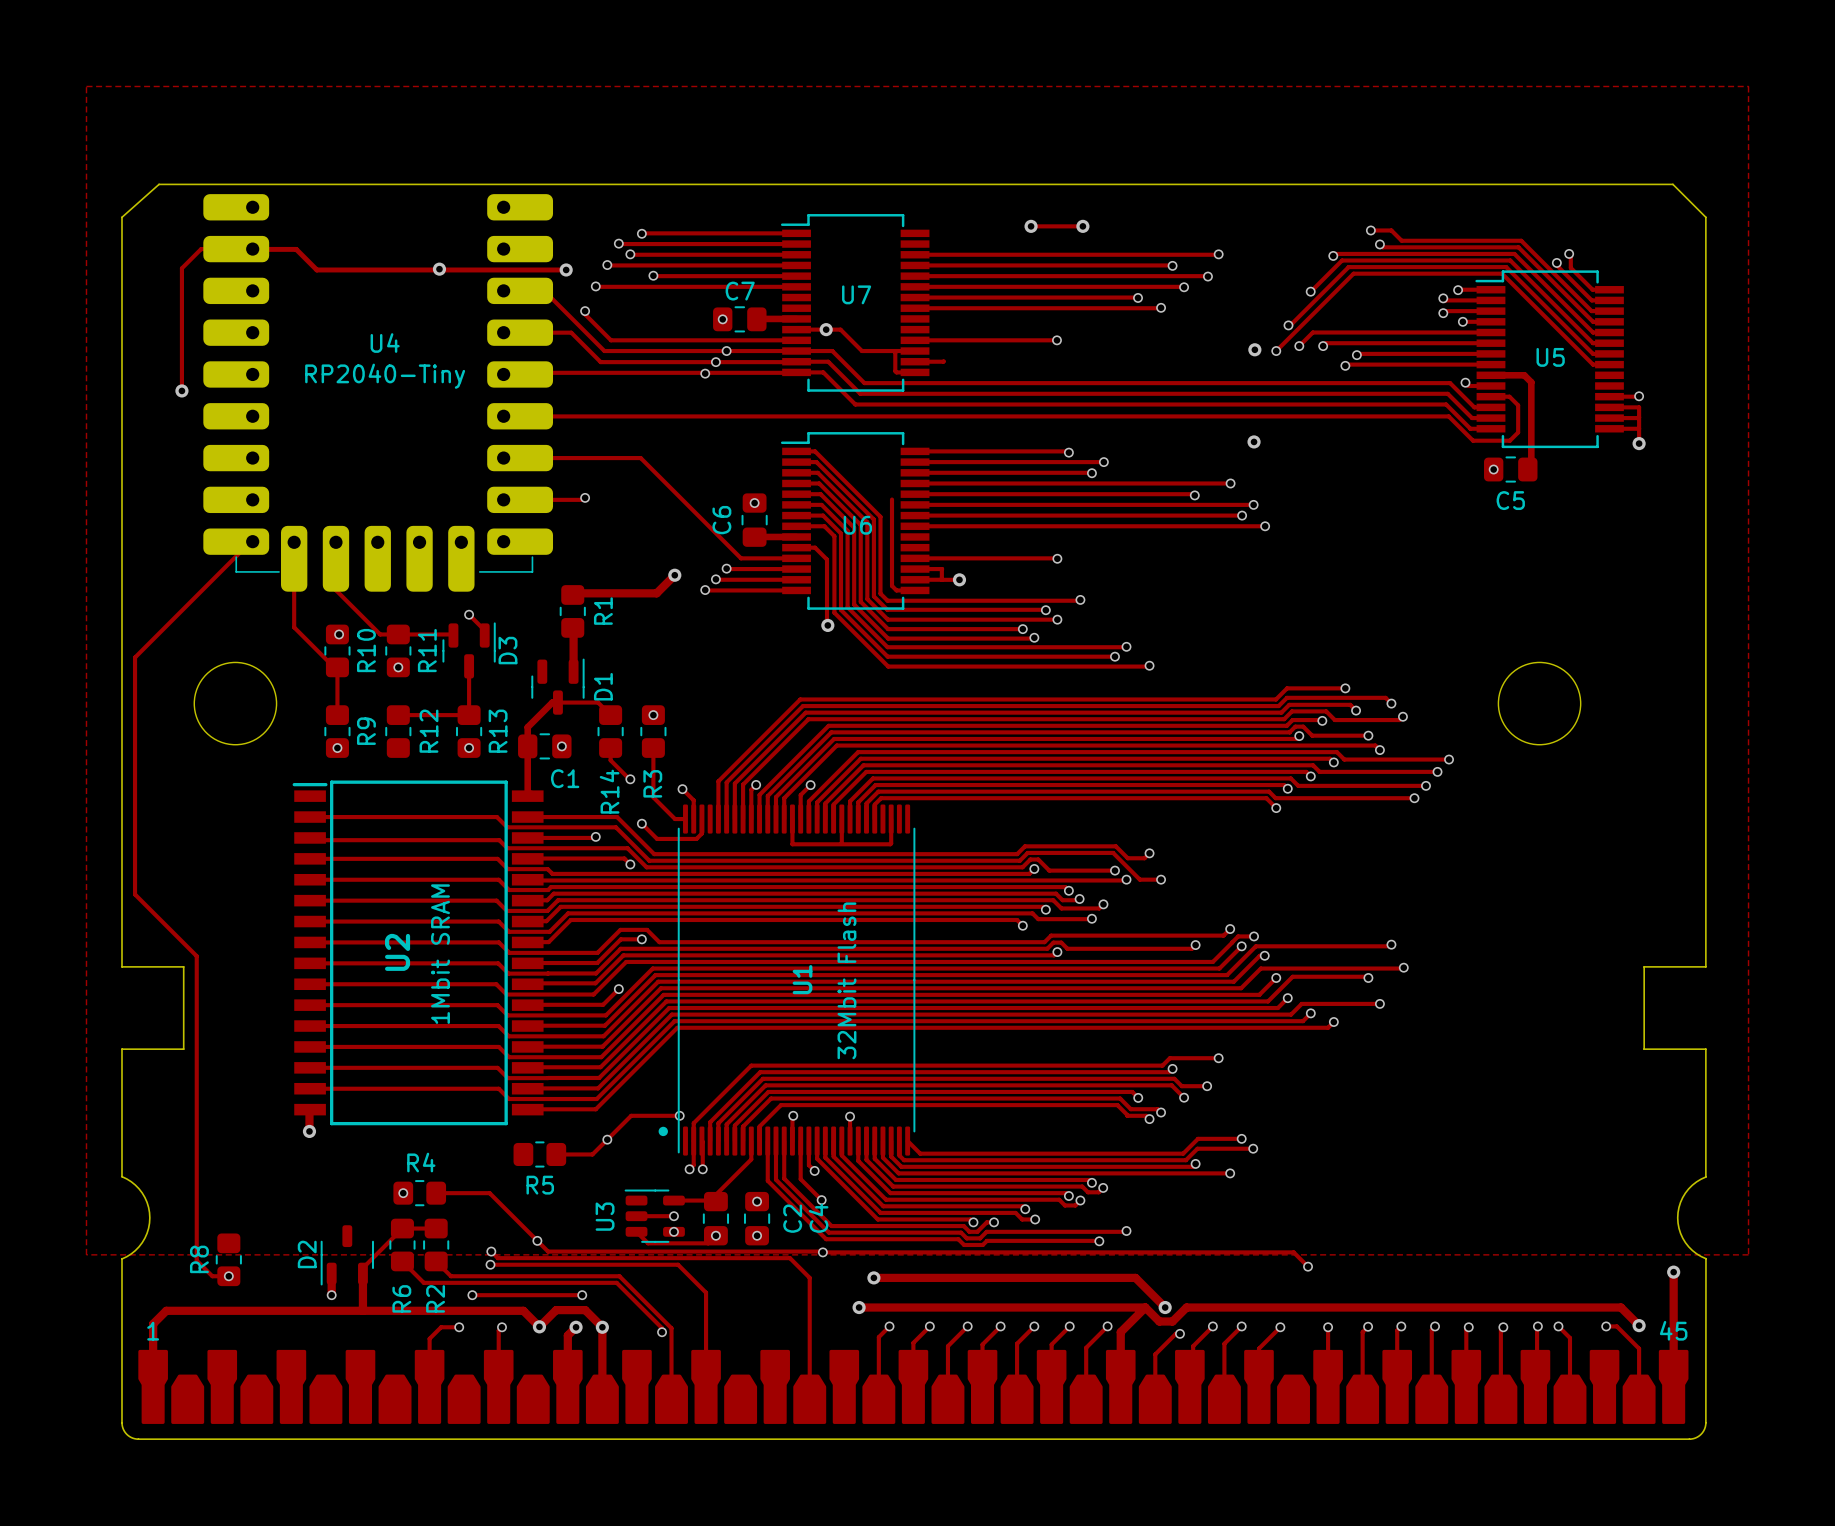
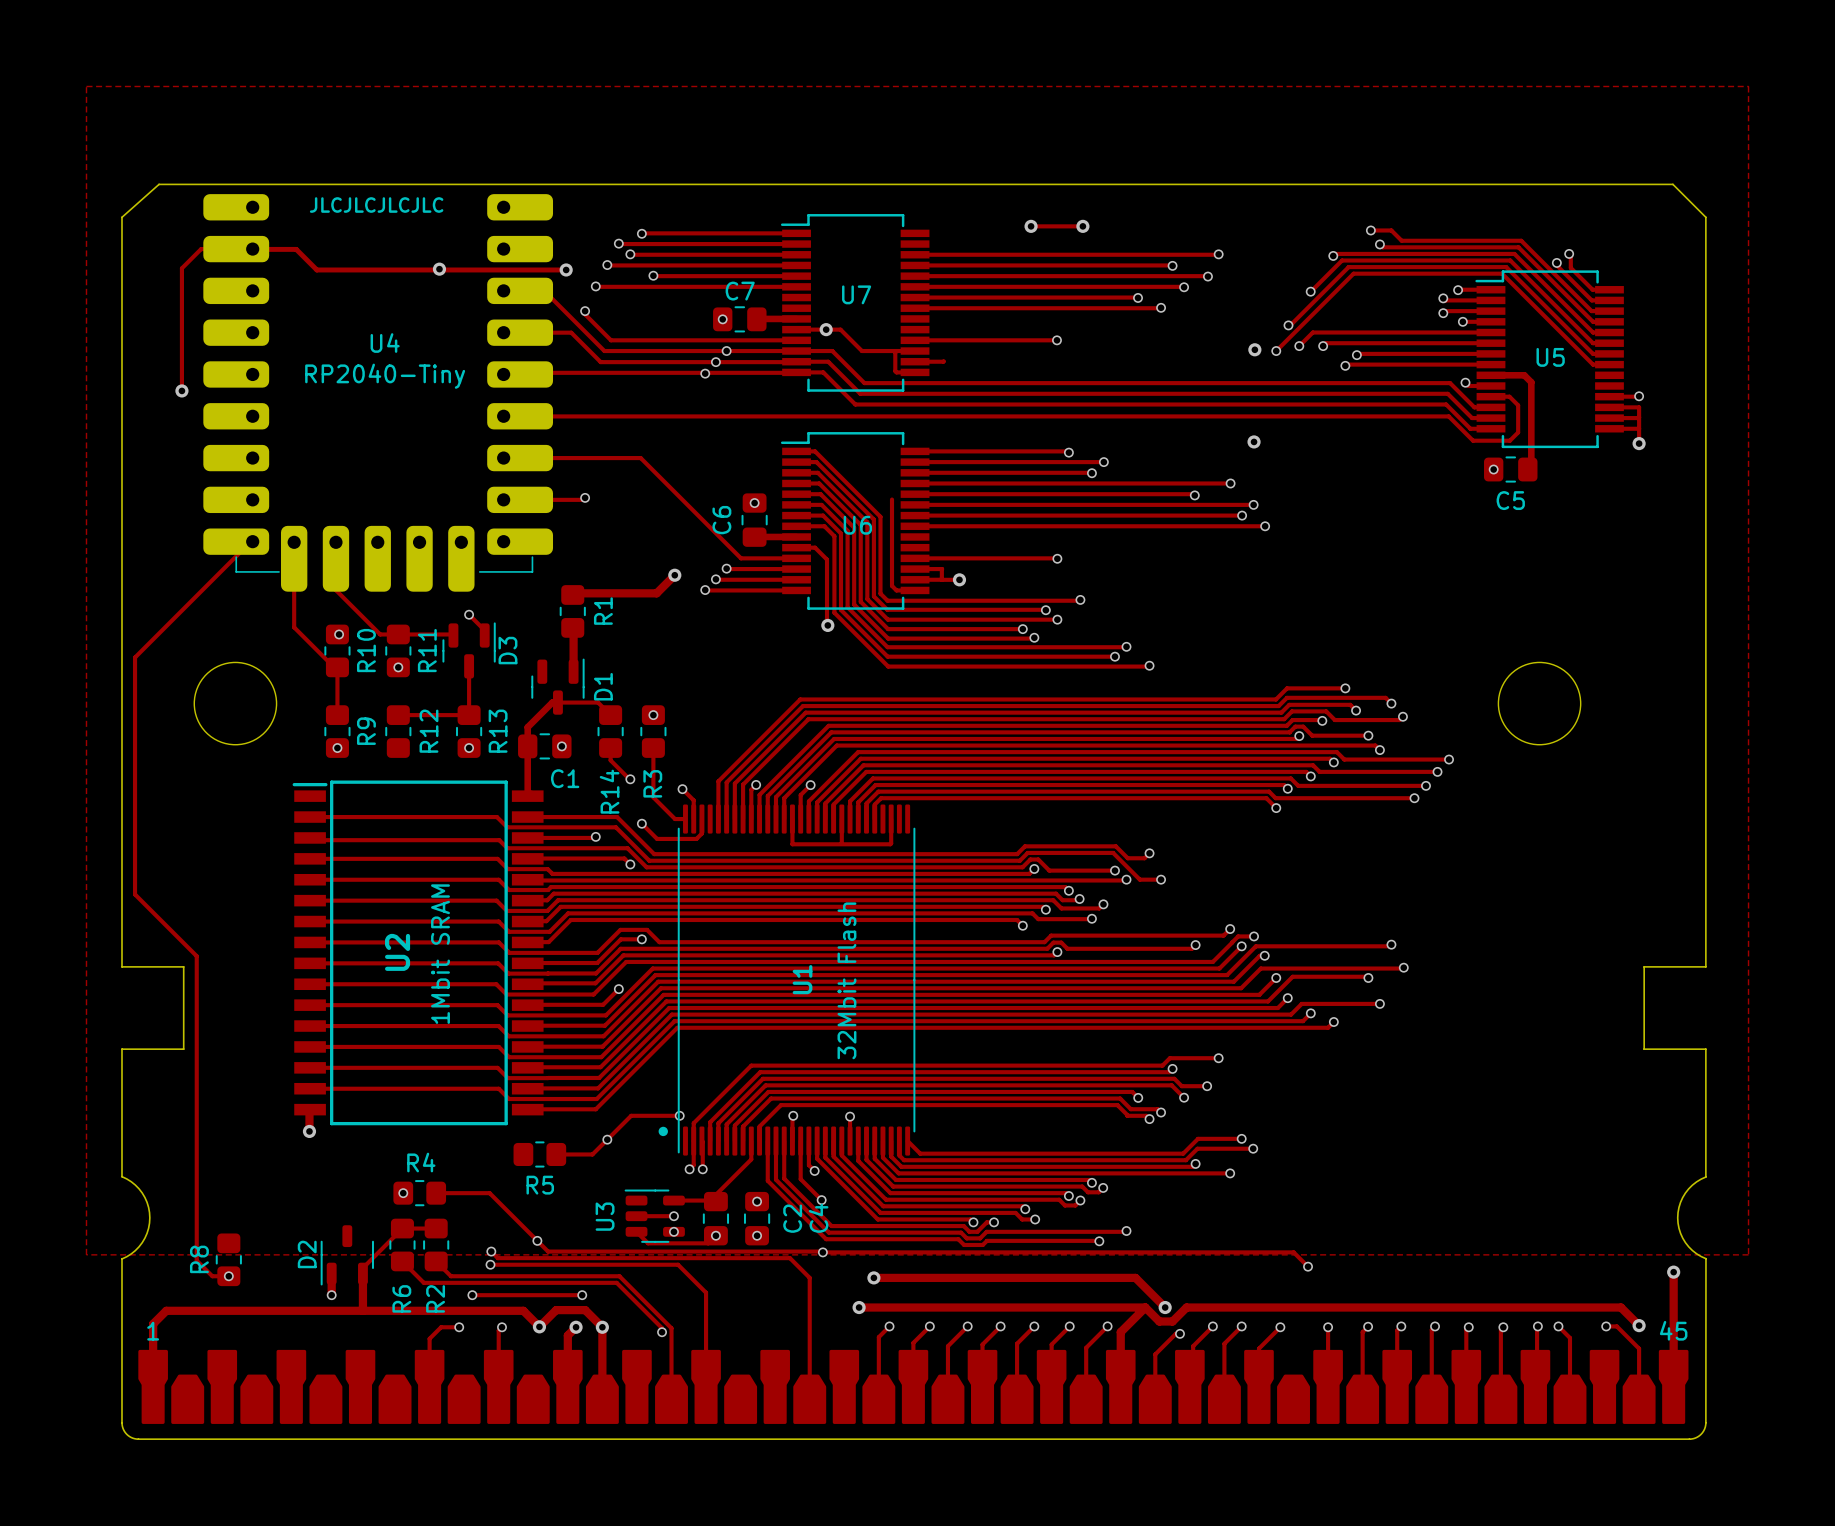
text: none -> JLCJLCJLCJLC (376, 205)

